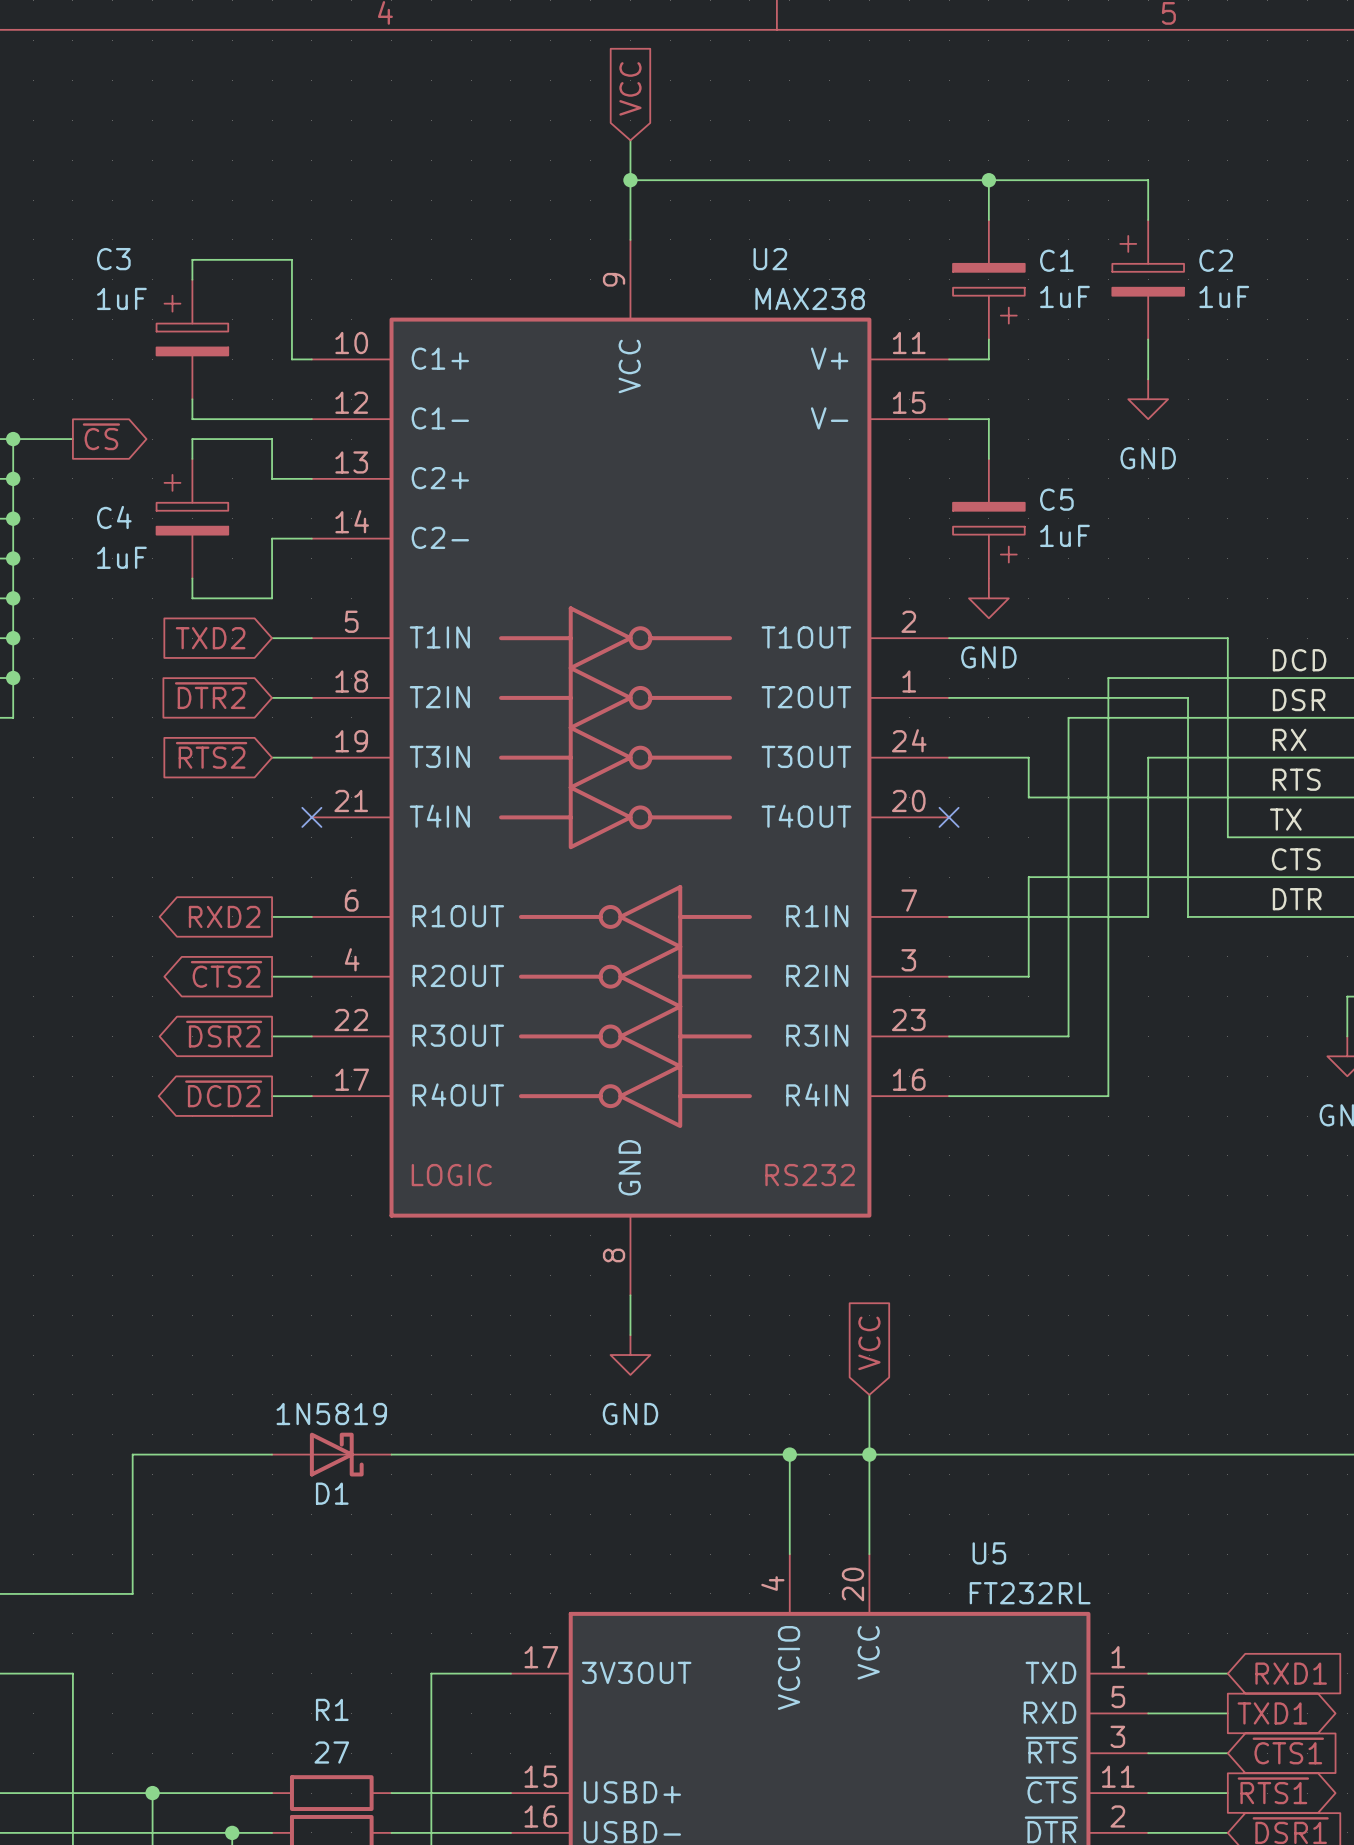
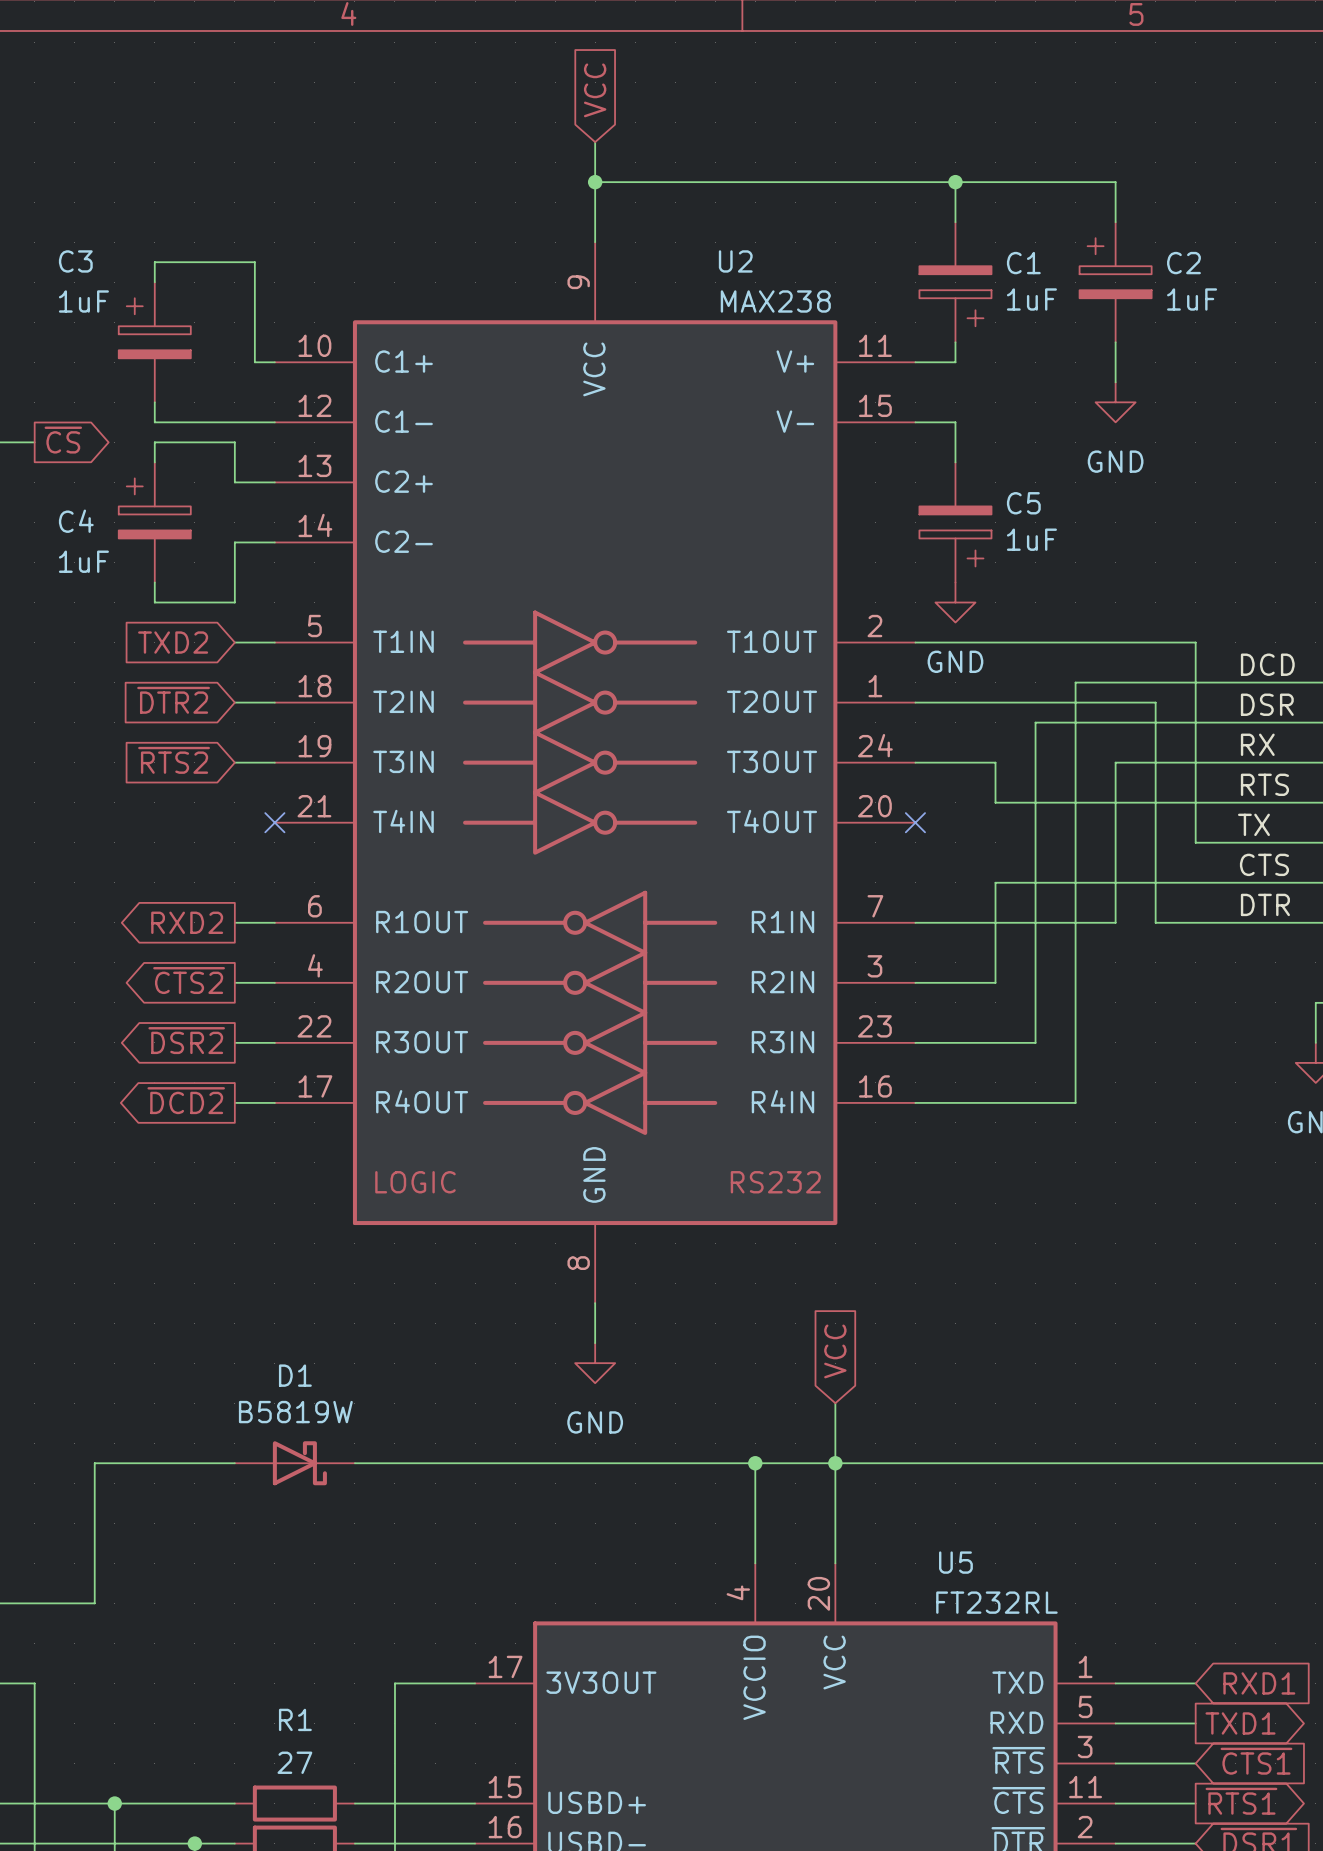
D1 value: 1N5819 (331, 1414) -> B5819W (295, 1412)
D1 name position: D1 (332, 1493) -> D1 (295, 1375)

